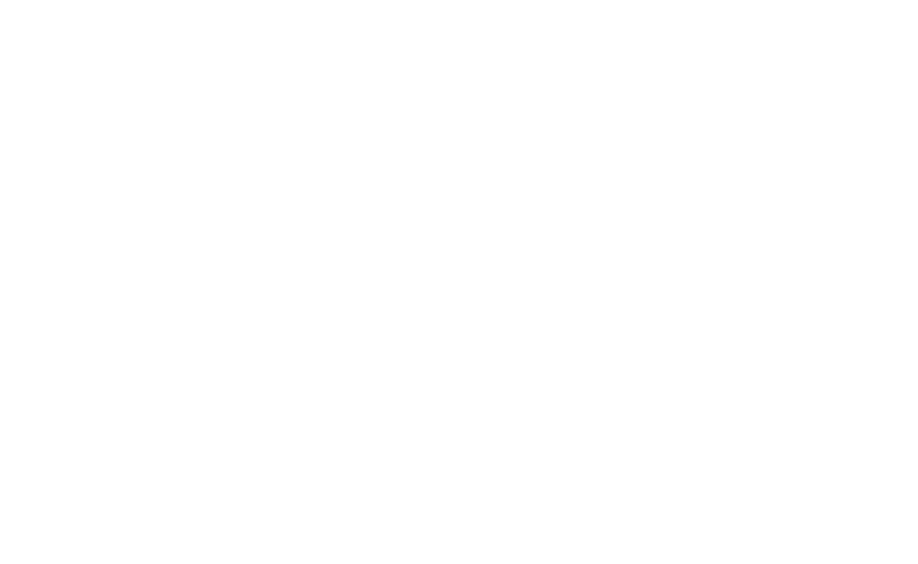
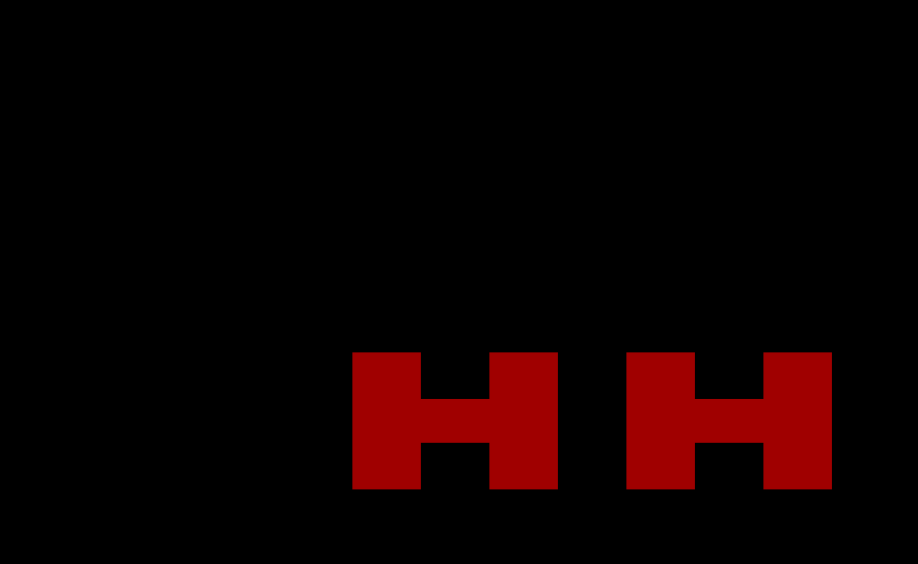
part: none -> (455, 420)
part: none -> (729, 420)

